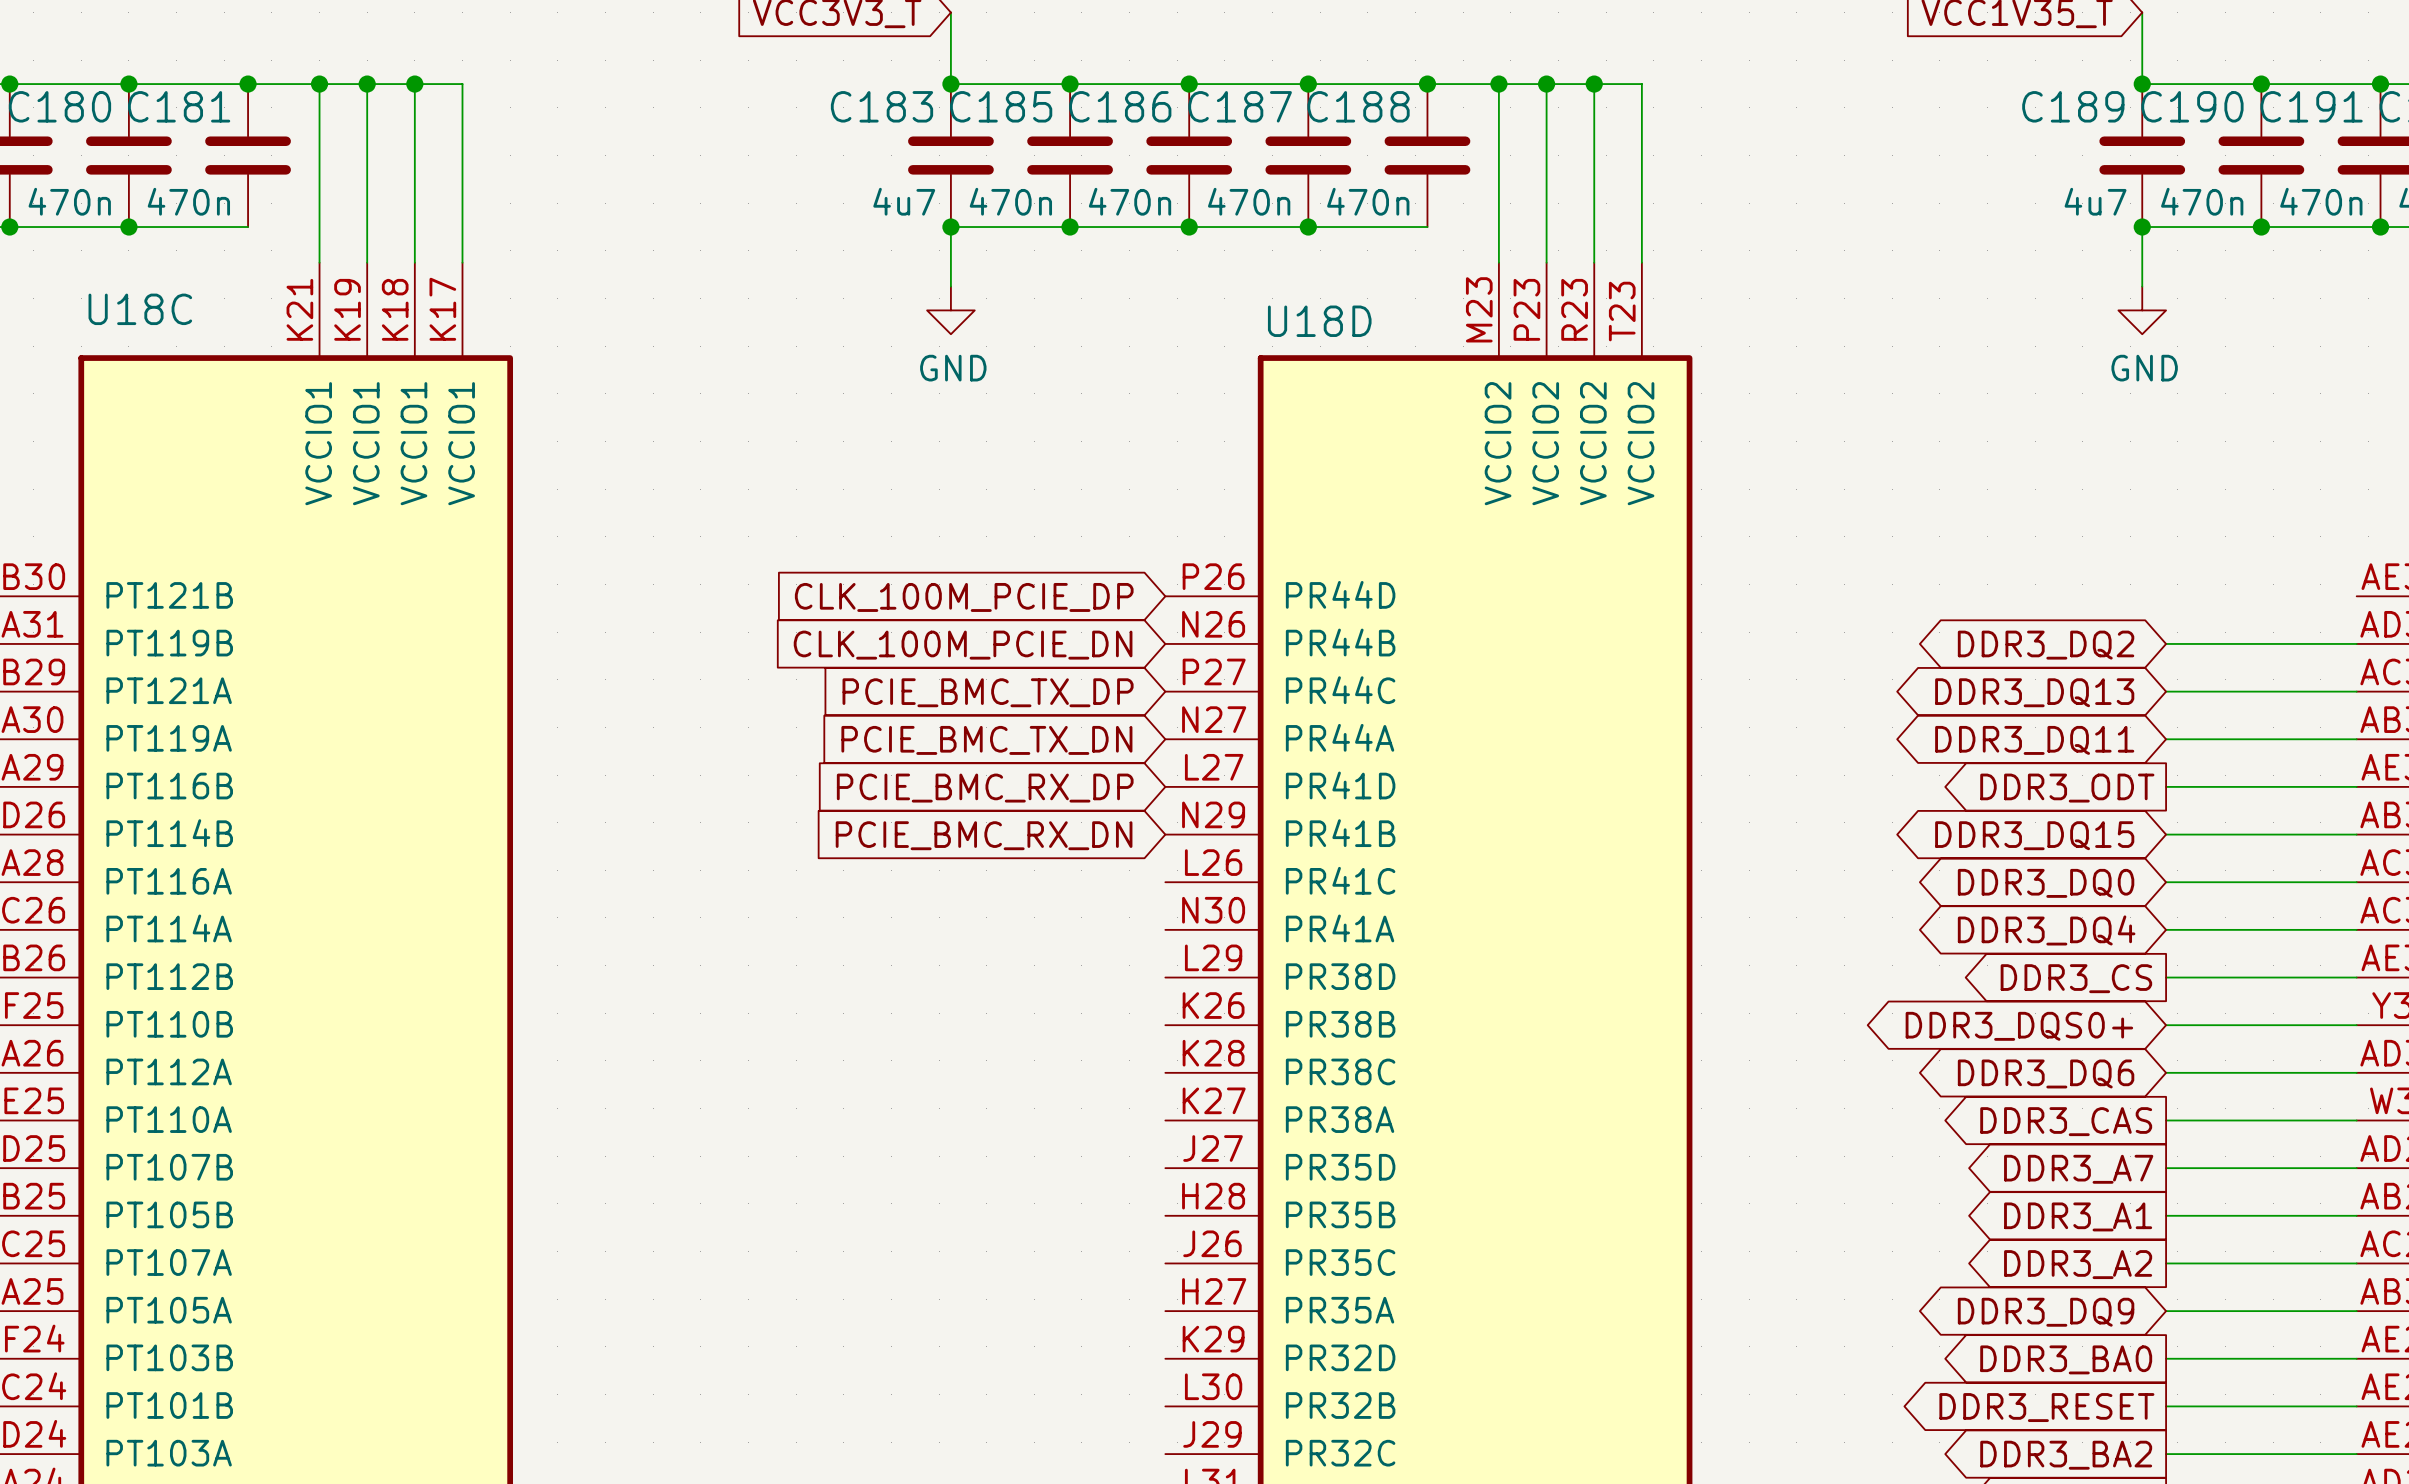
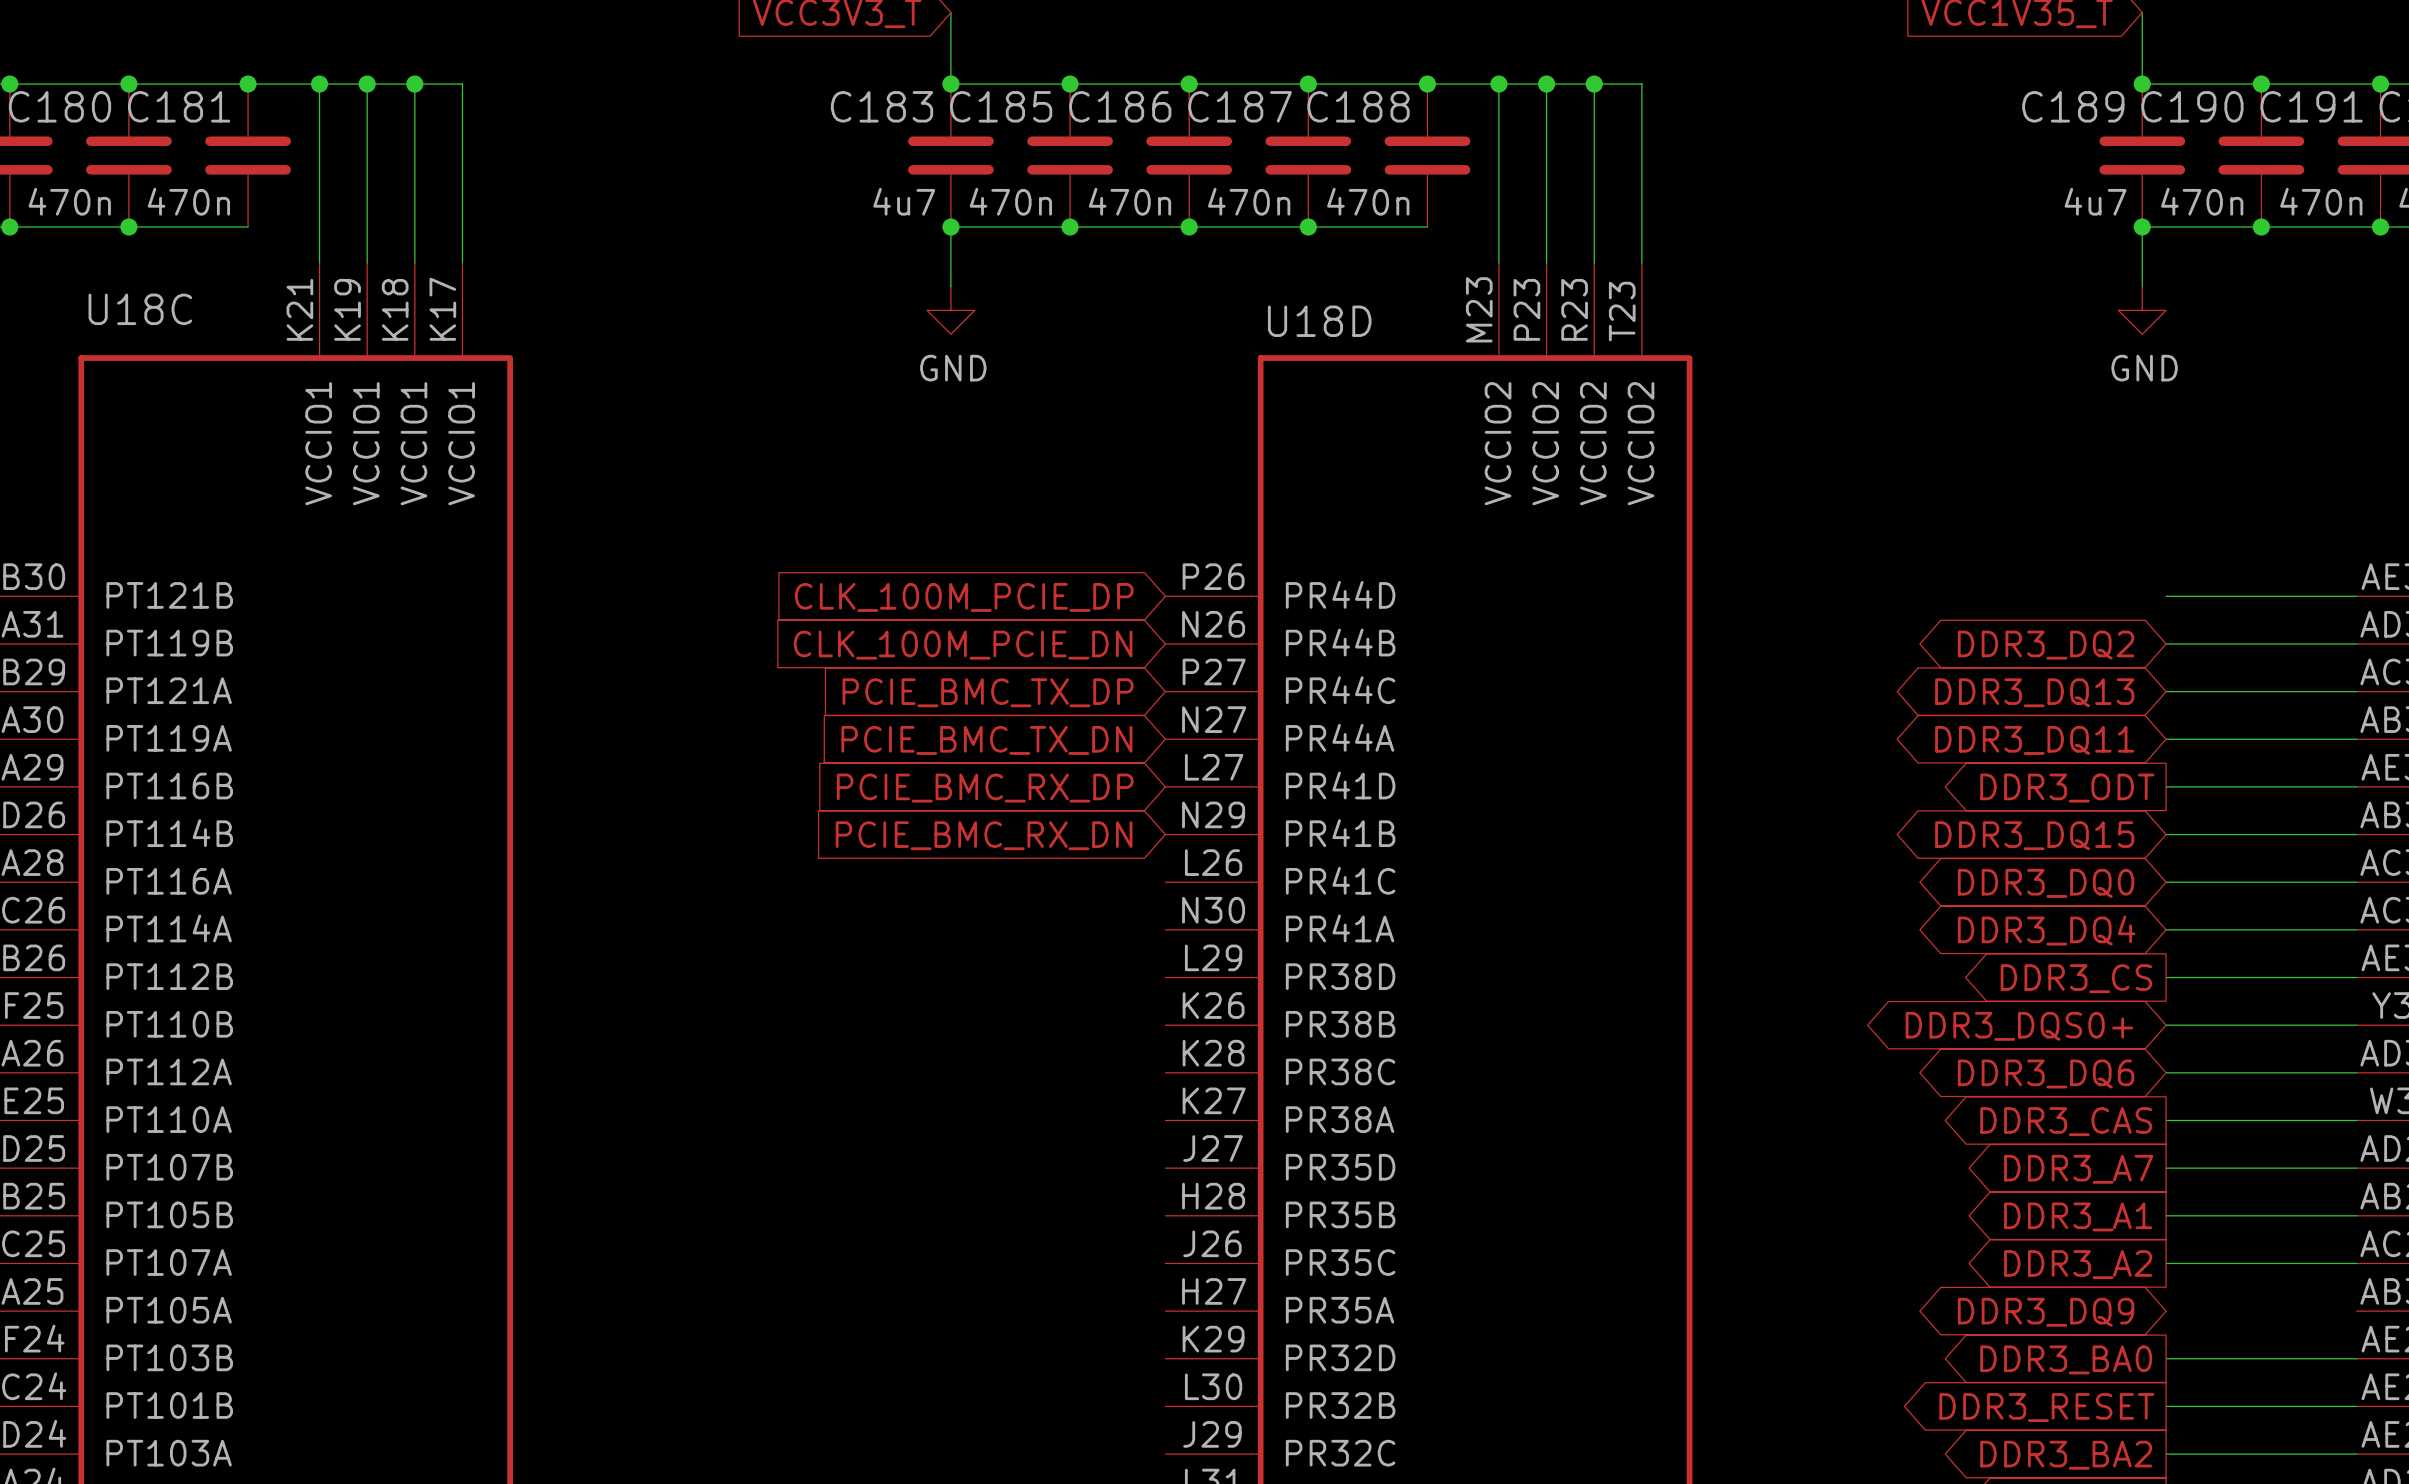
wire: none -> (2166, 596) (2356, 596)
wire: (2166, 1311) (2356, 1311) -> none

